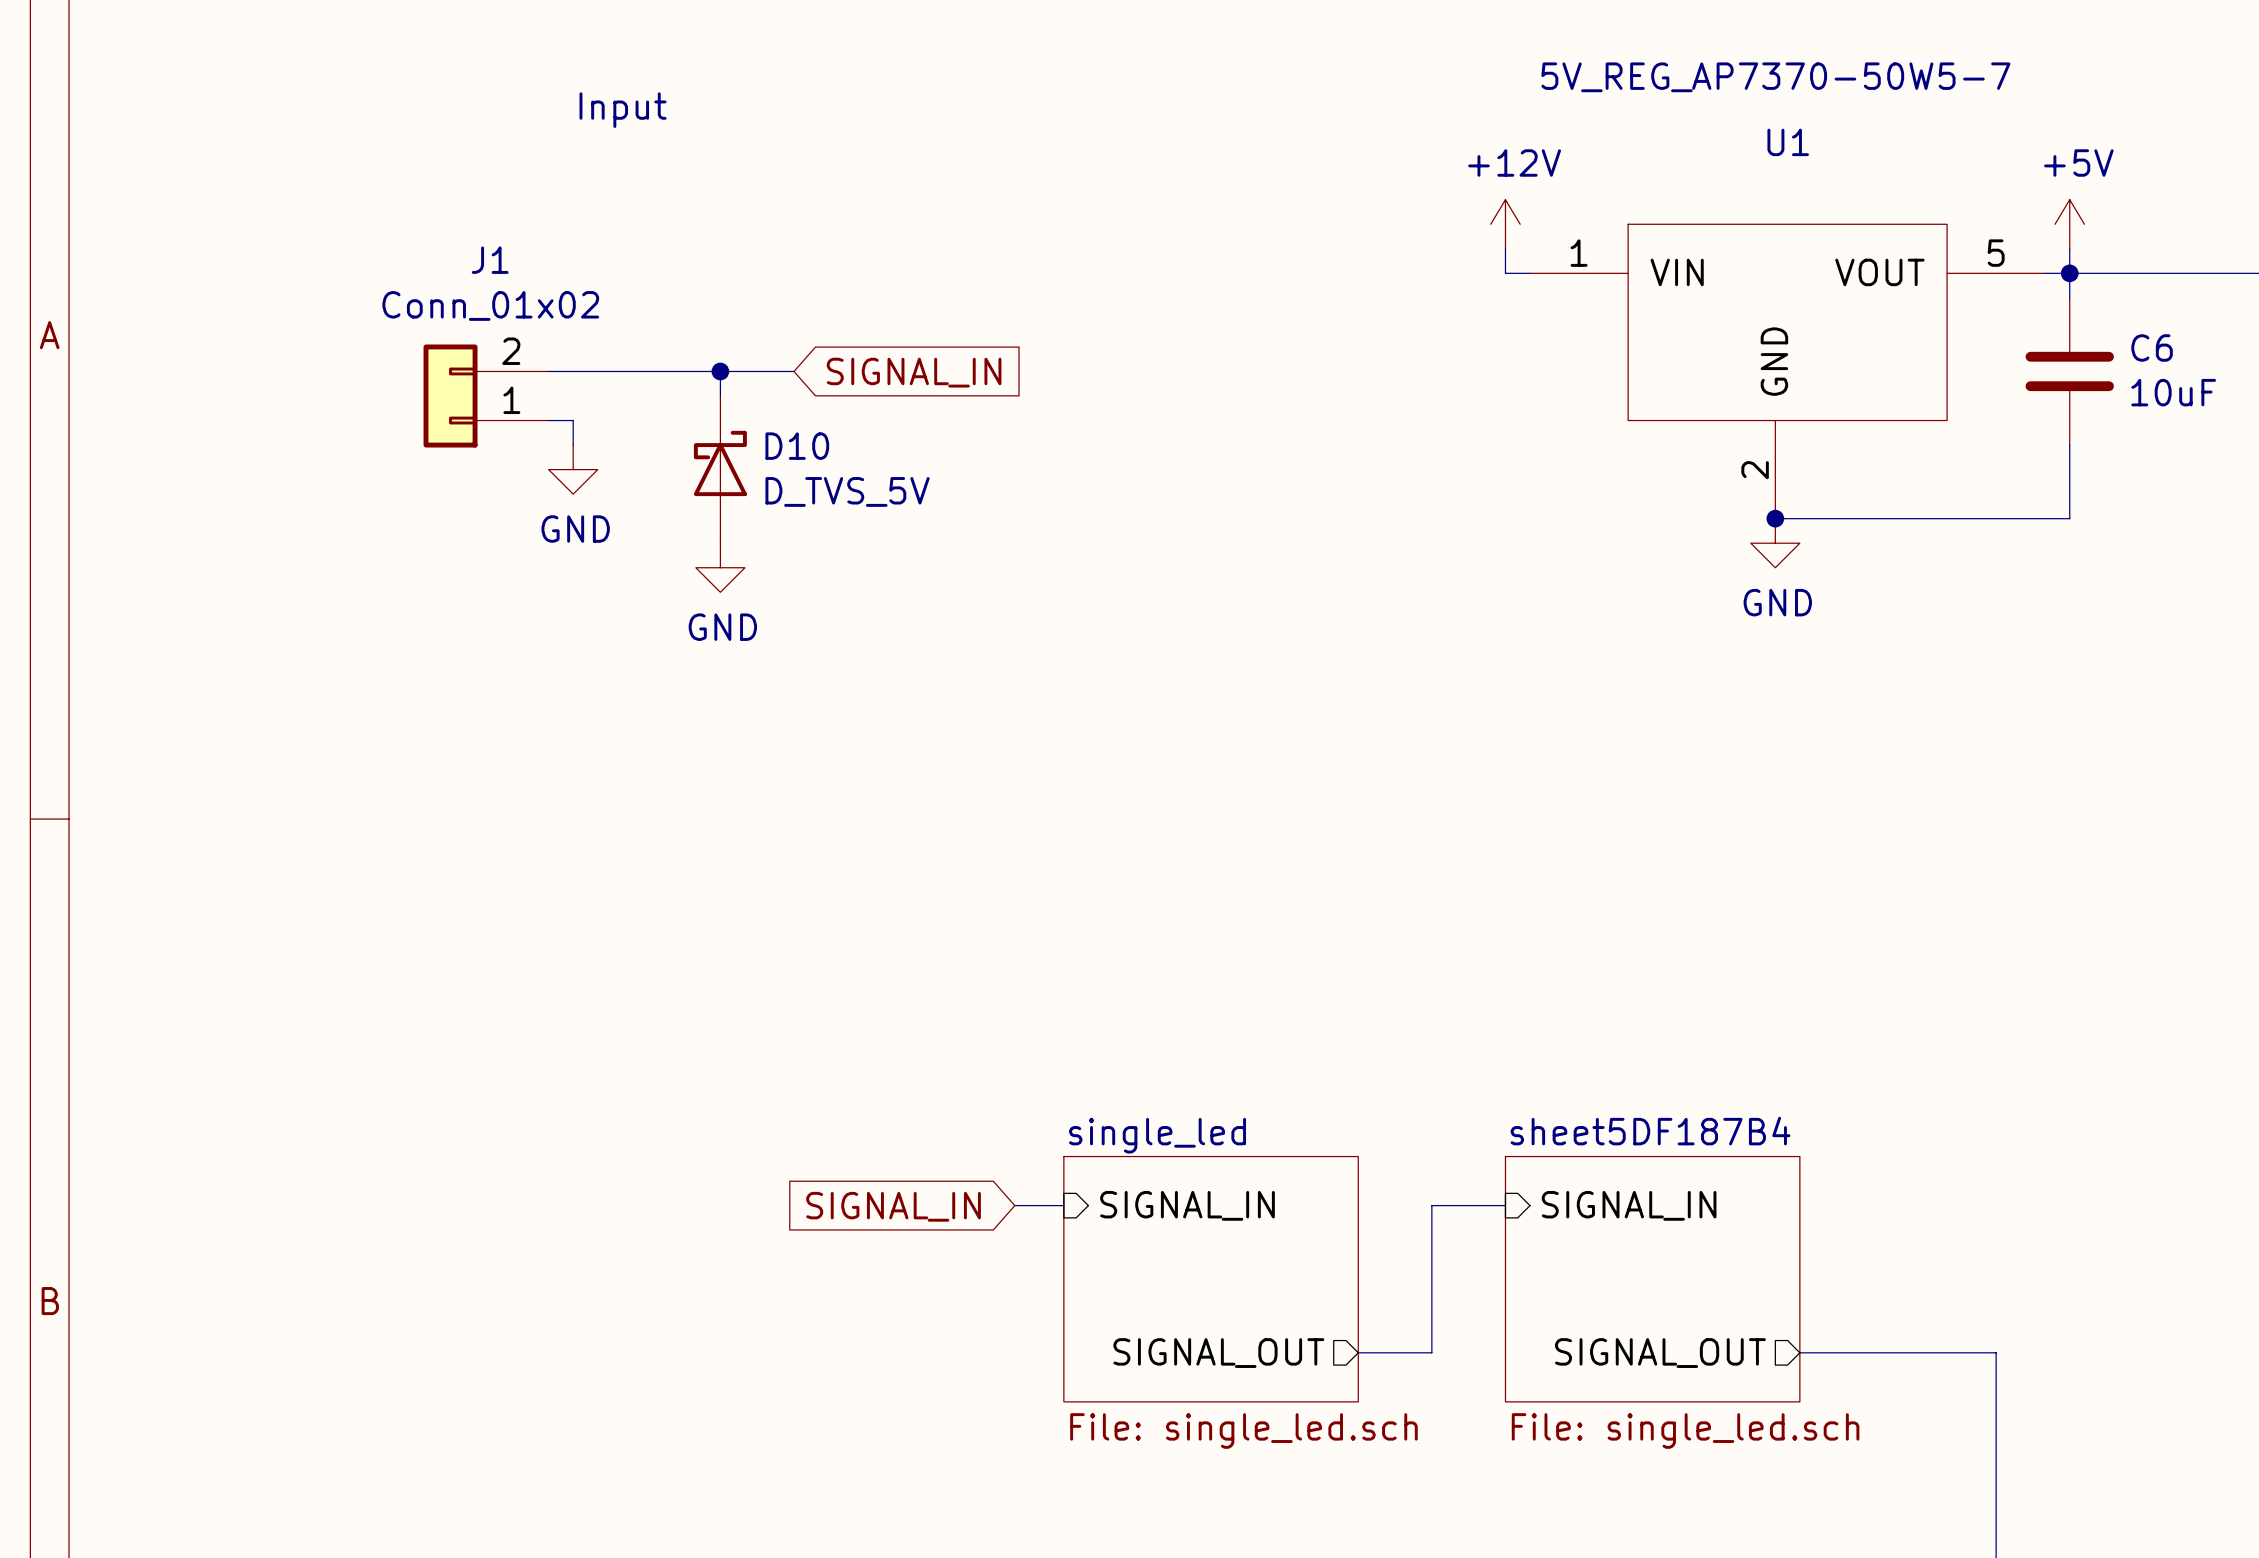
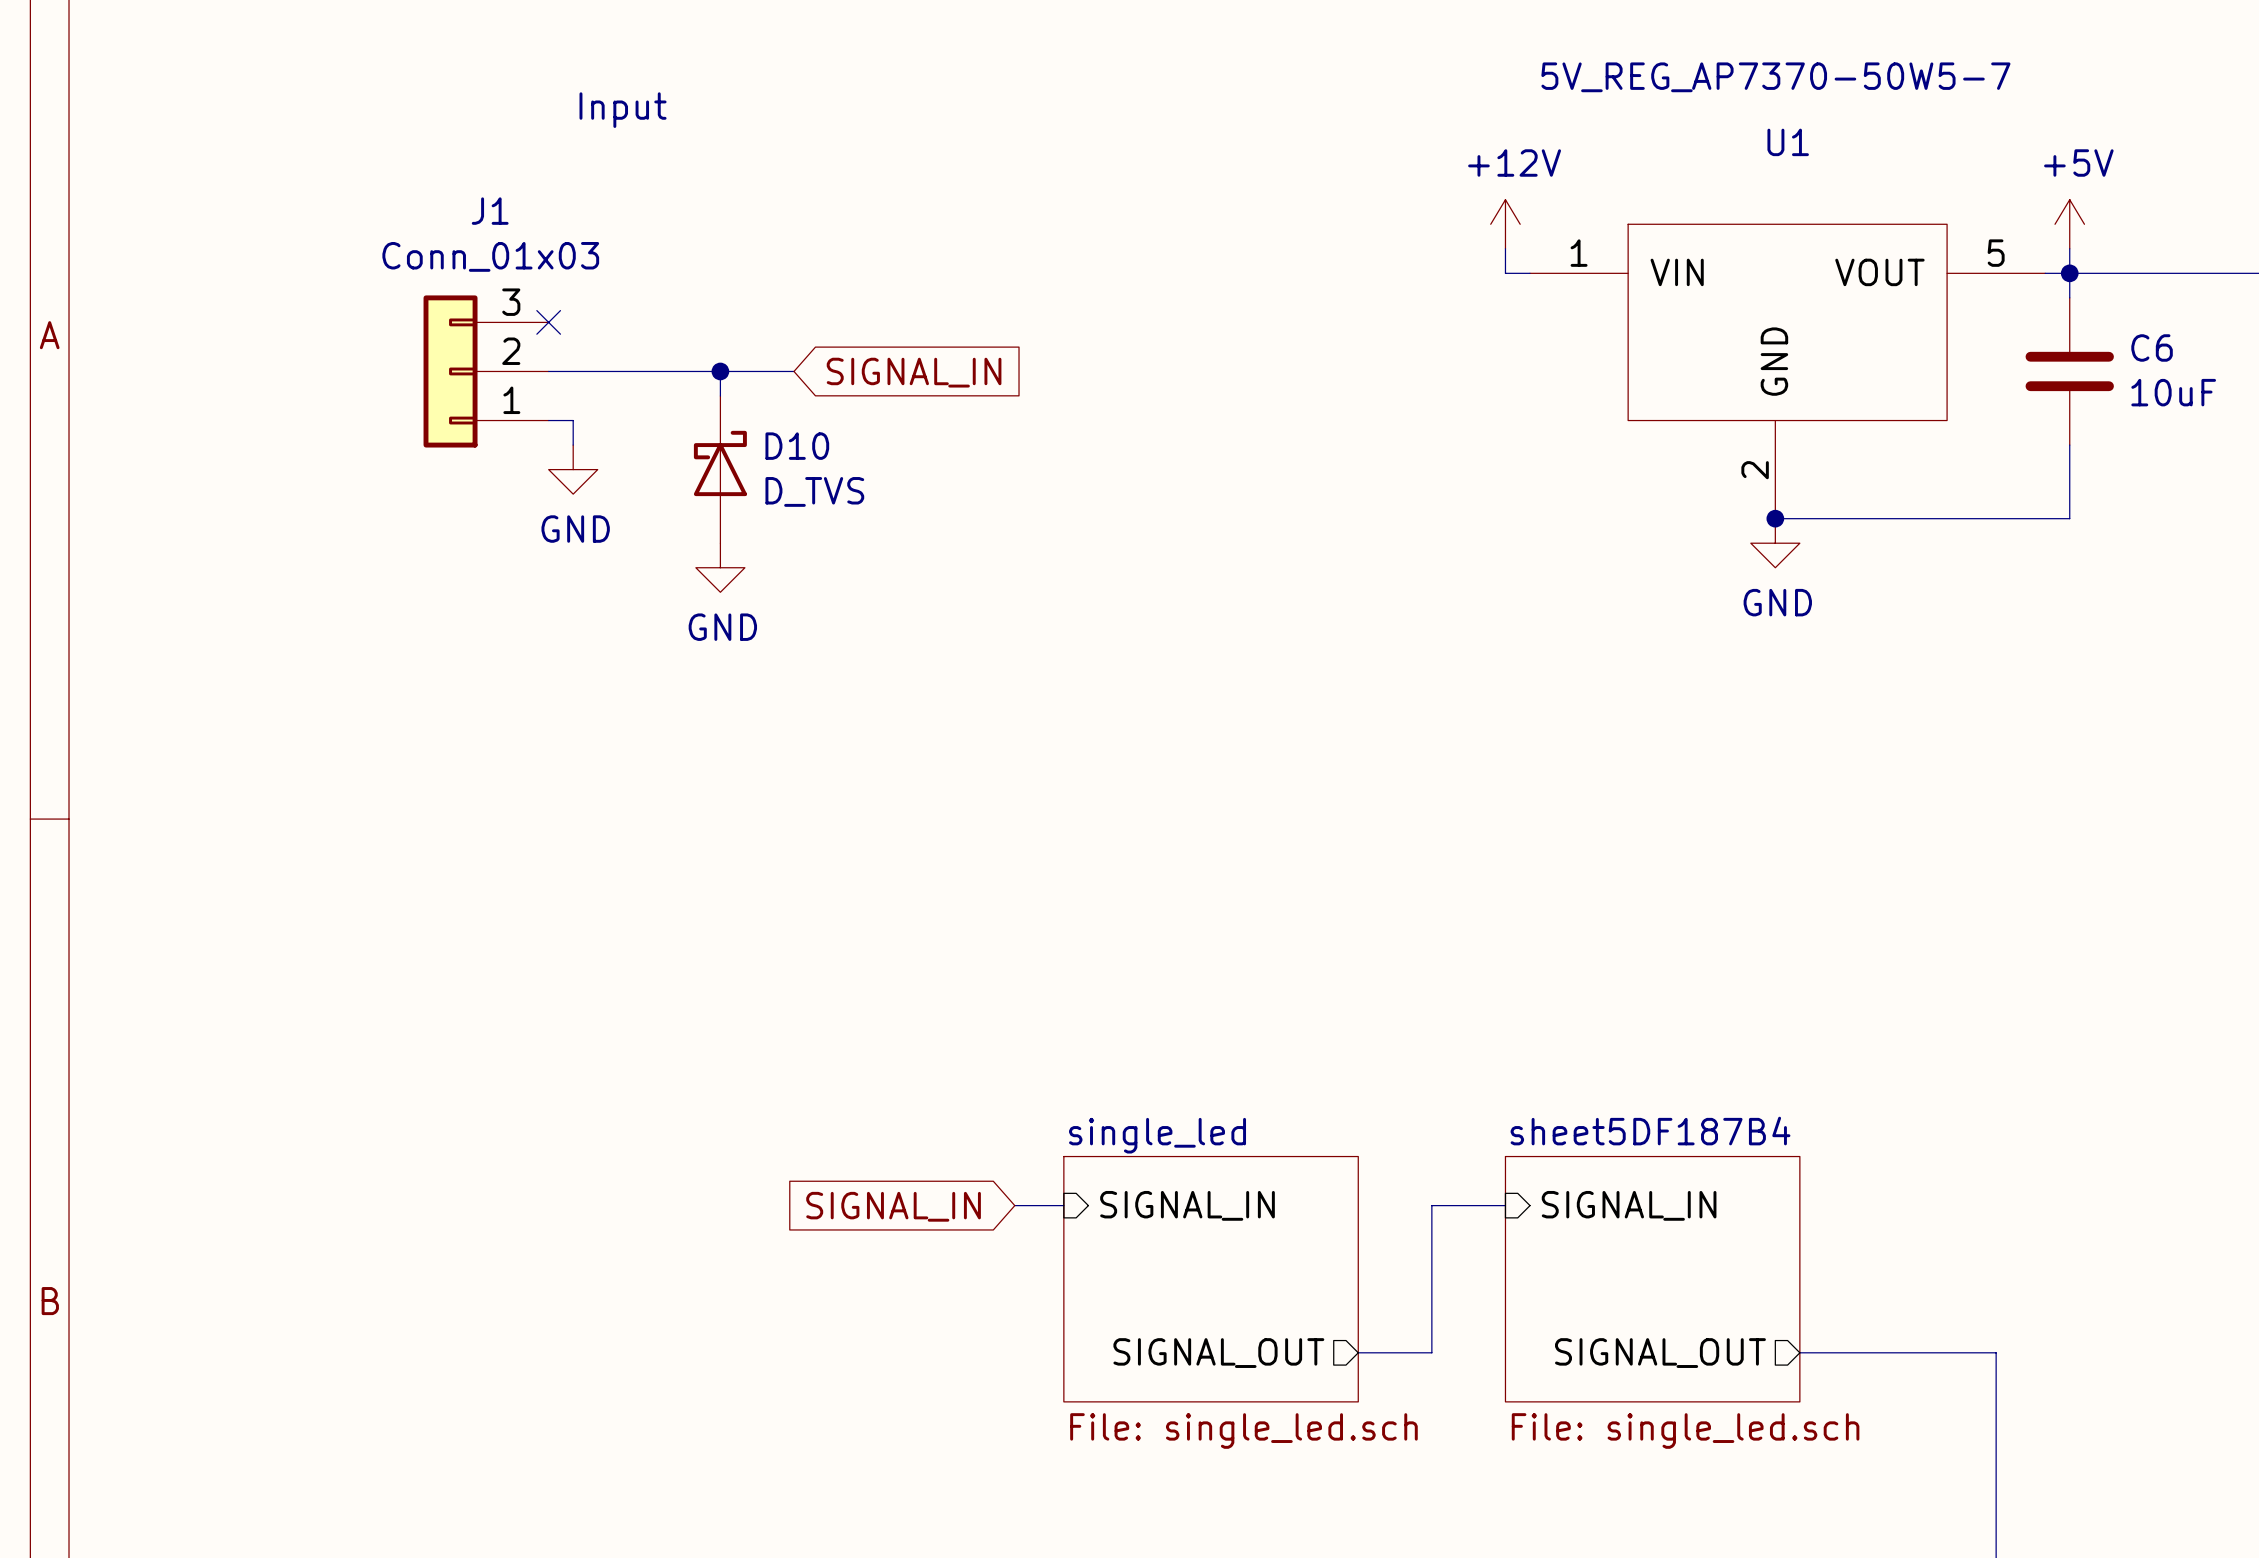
J1 value: Conn_01x02 (490, 305) -> Conn_01x03 (490, 256)
no-connect mark: none -> (548, 322)
J1 symbol: [423, 344, 549, 448] -> [423, 295, 549, 448]
D10 value: D_TVS_5V (847, 491) -> D_TVS (814, 491)

